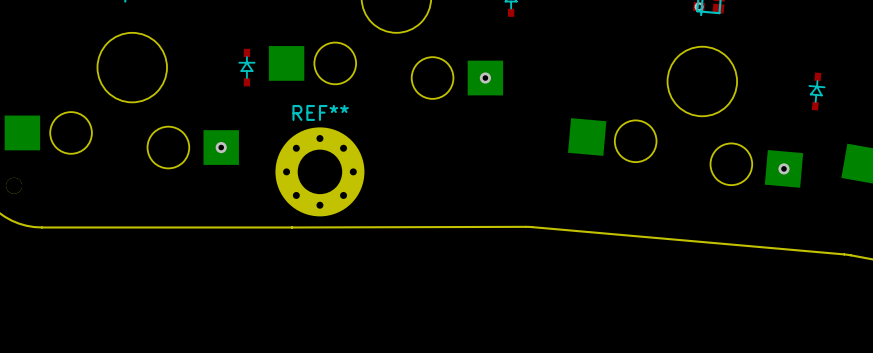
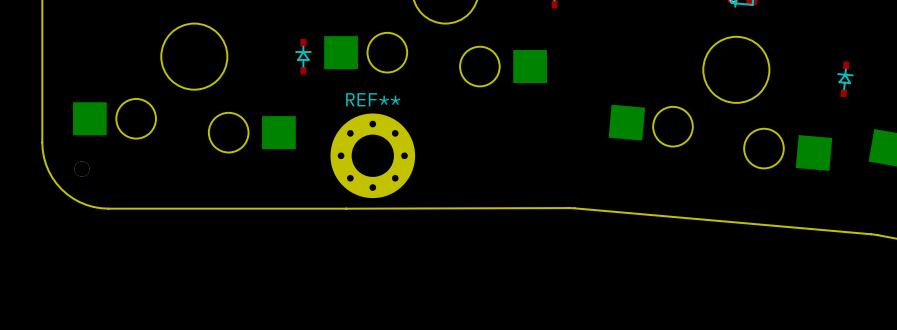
via: (485, 78) -> none
via: (221, 147) -> none
via: (783, 168) -> none

